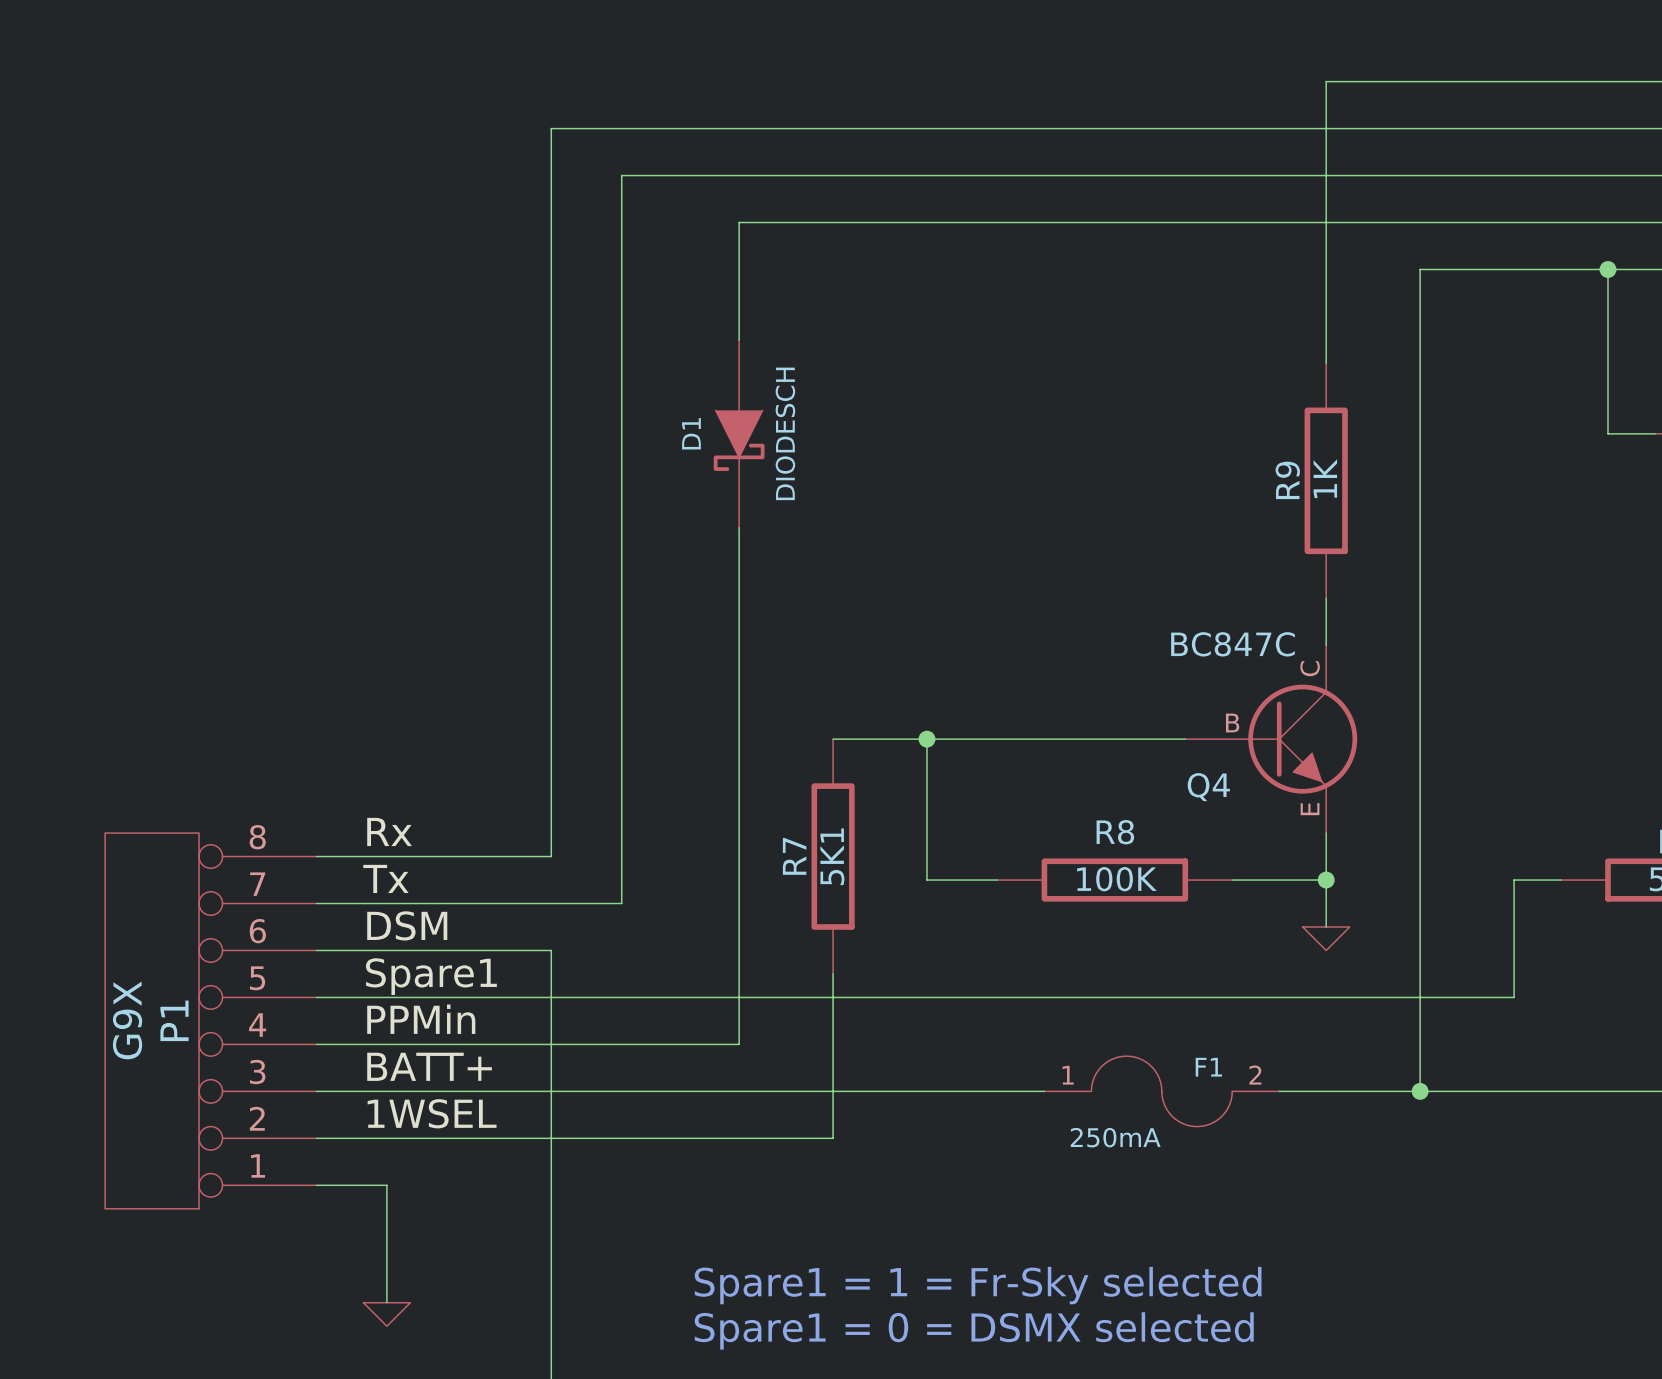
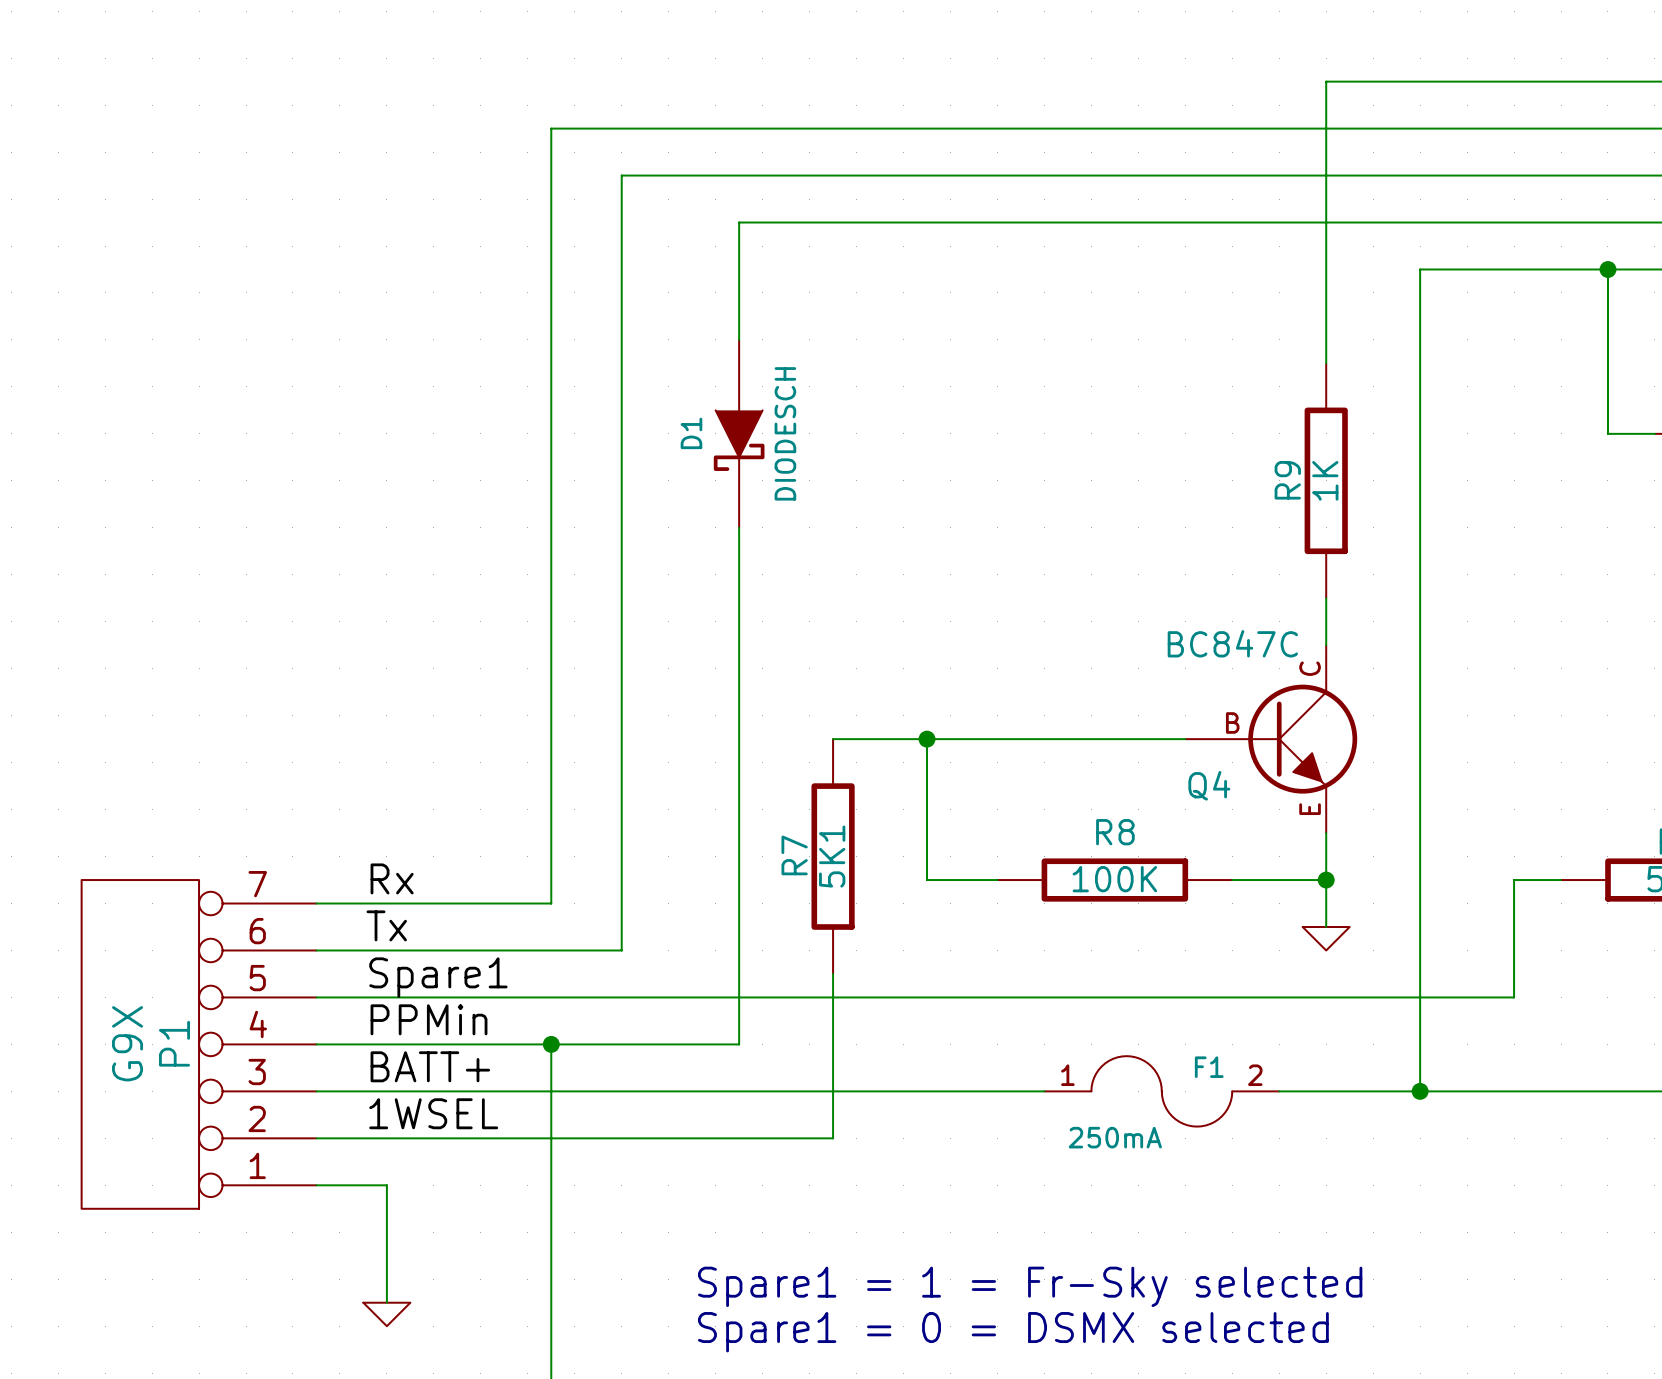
label: Rx (389, 831) -> none
P1 symbol: [105, 833, 317, 1209] -> [81, 880, 317, 1209]
wire: (316, 856) (551, 856) -> (551, 903) (551, 856)
label: Tx (385, 878) -> Rx (392, 878)
wire: (551, 903) (621, 903) -> (551, 950) (621, 950) (621, 903)
label: DSM (407, 925) -> Tx (386, 925)
wire: (551, 950) (551, 1044) -> none
junction: none -> (551, 1044)

